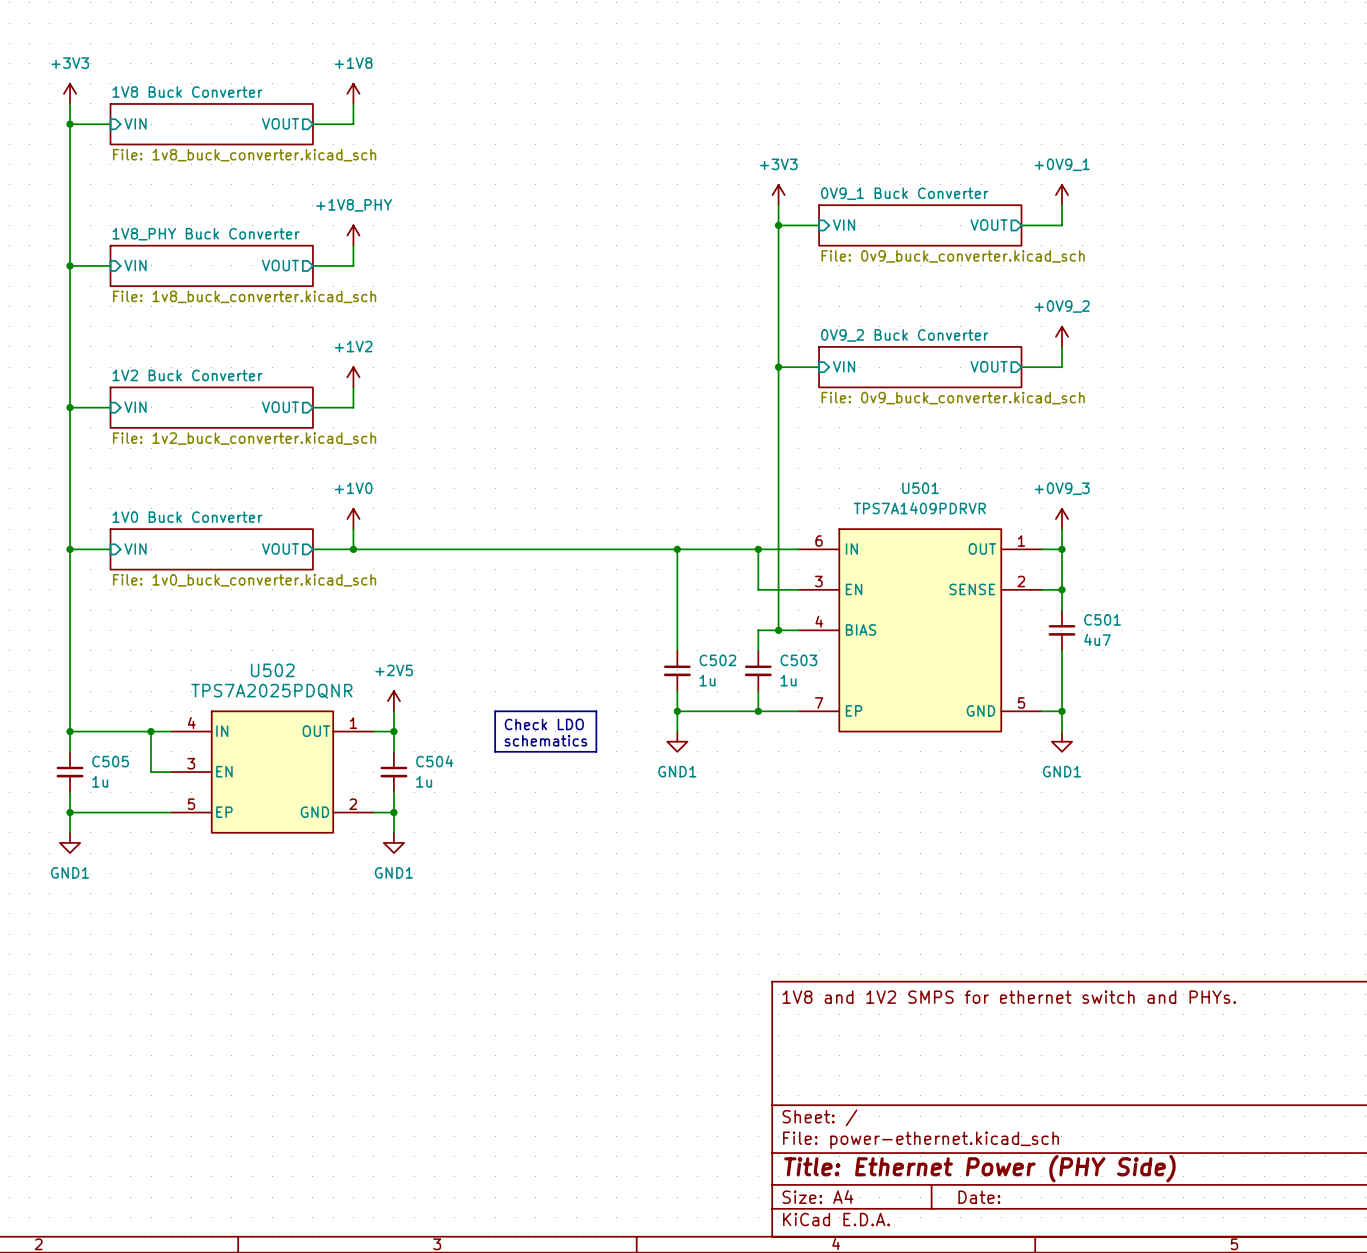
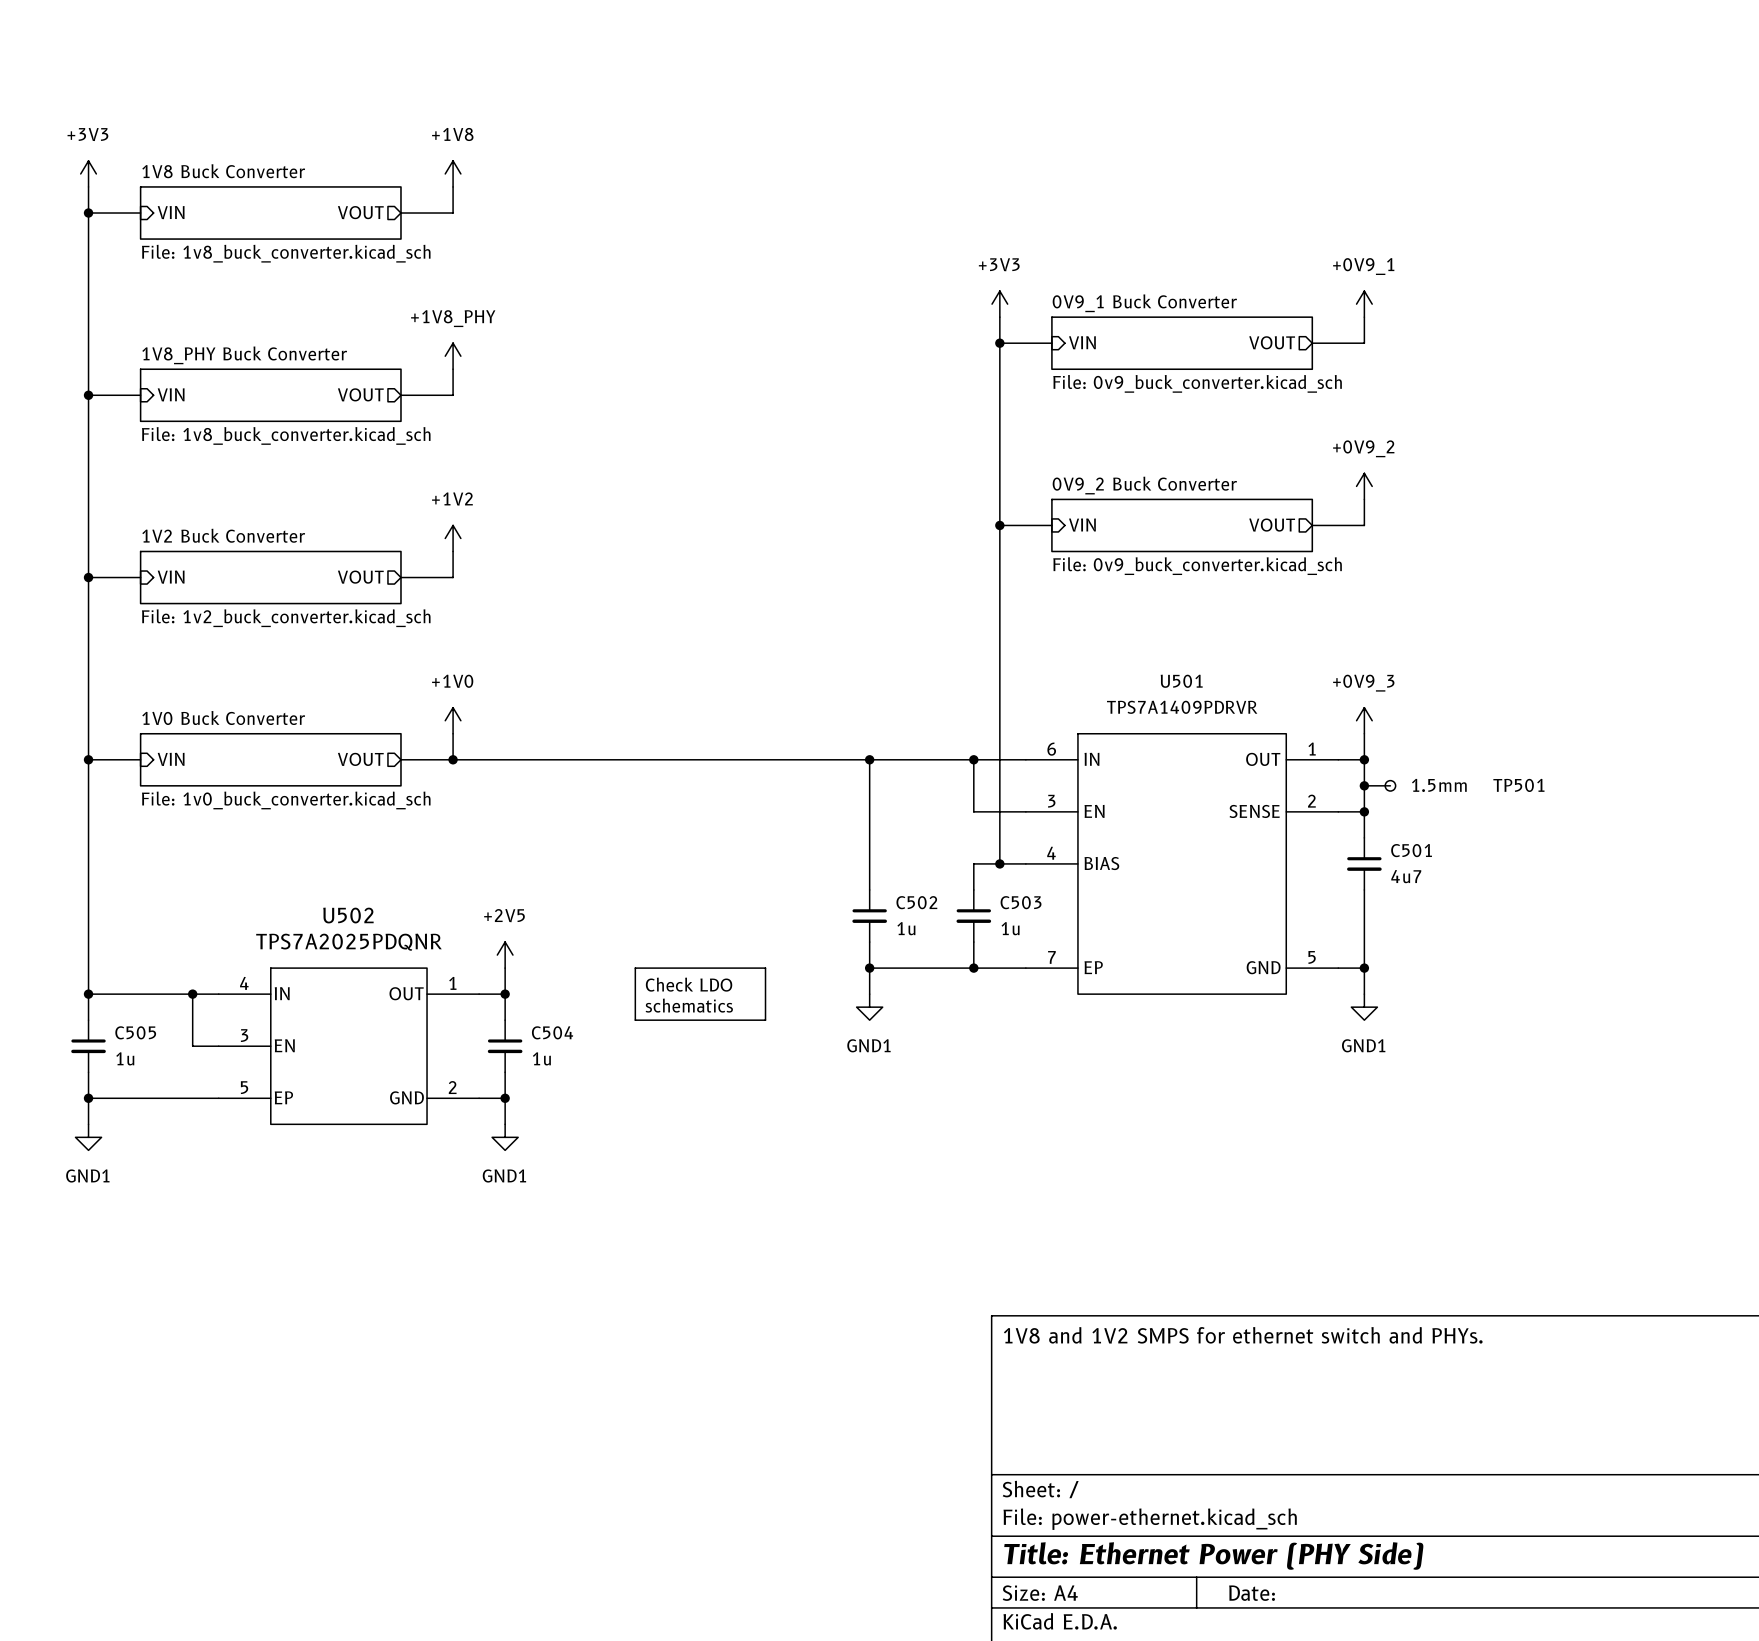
wire: none -> (1364, 785) (1390, 785)
junction: none -> (1364, 785)
TP501: none -> 1.5mm (1390, 785)

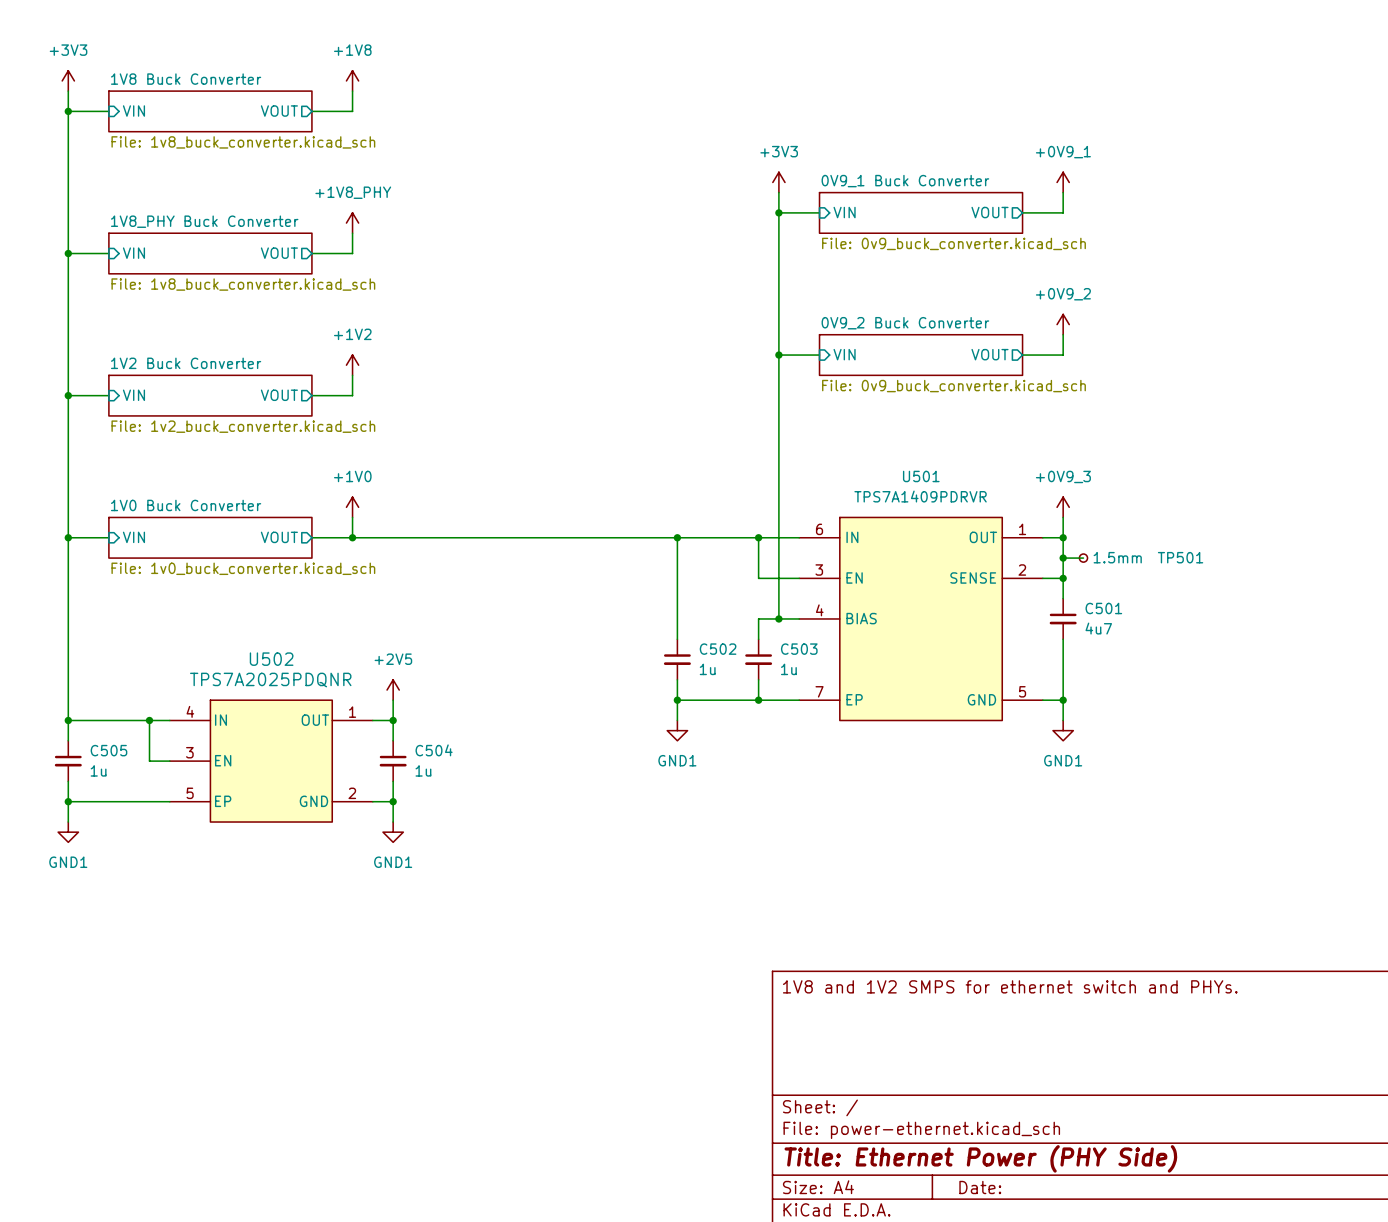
line: (635, 968) (765, 968) (765, 1020) (635, 1020) (635, 968) -> none
text: Check LDO (689, 984) -> none
text: schematics (689, 1005) -> none

